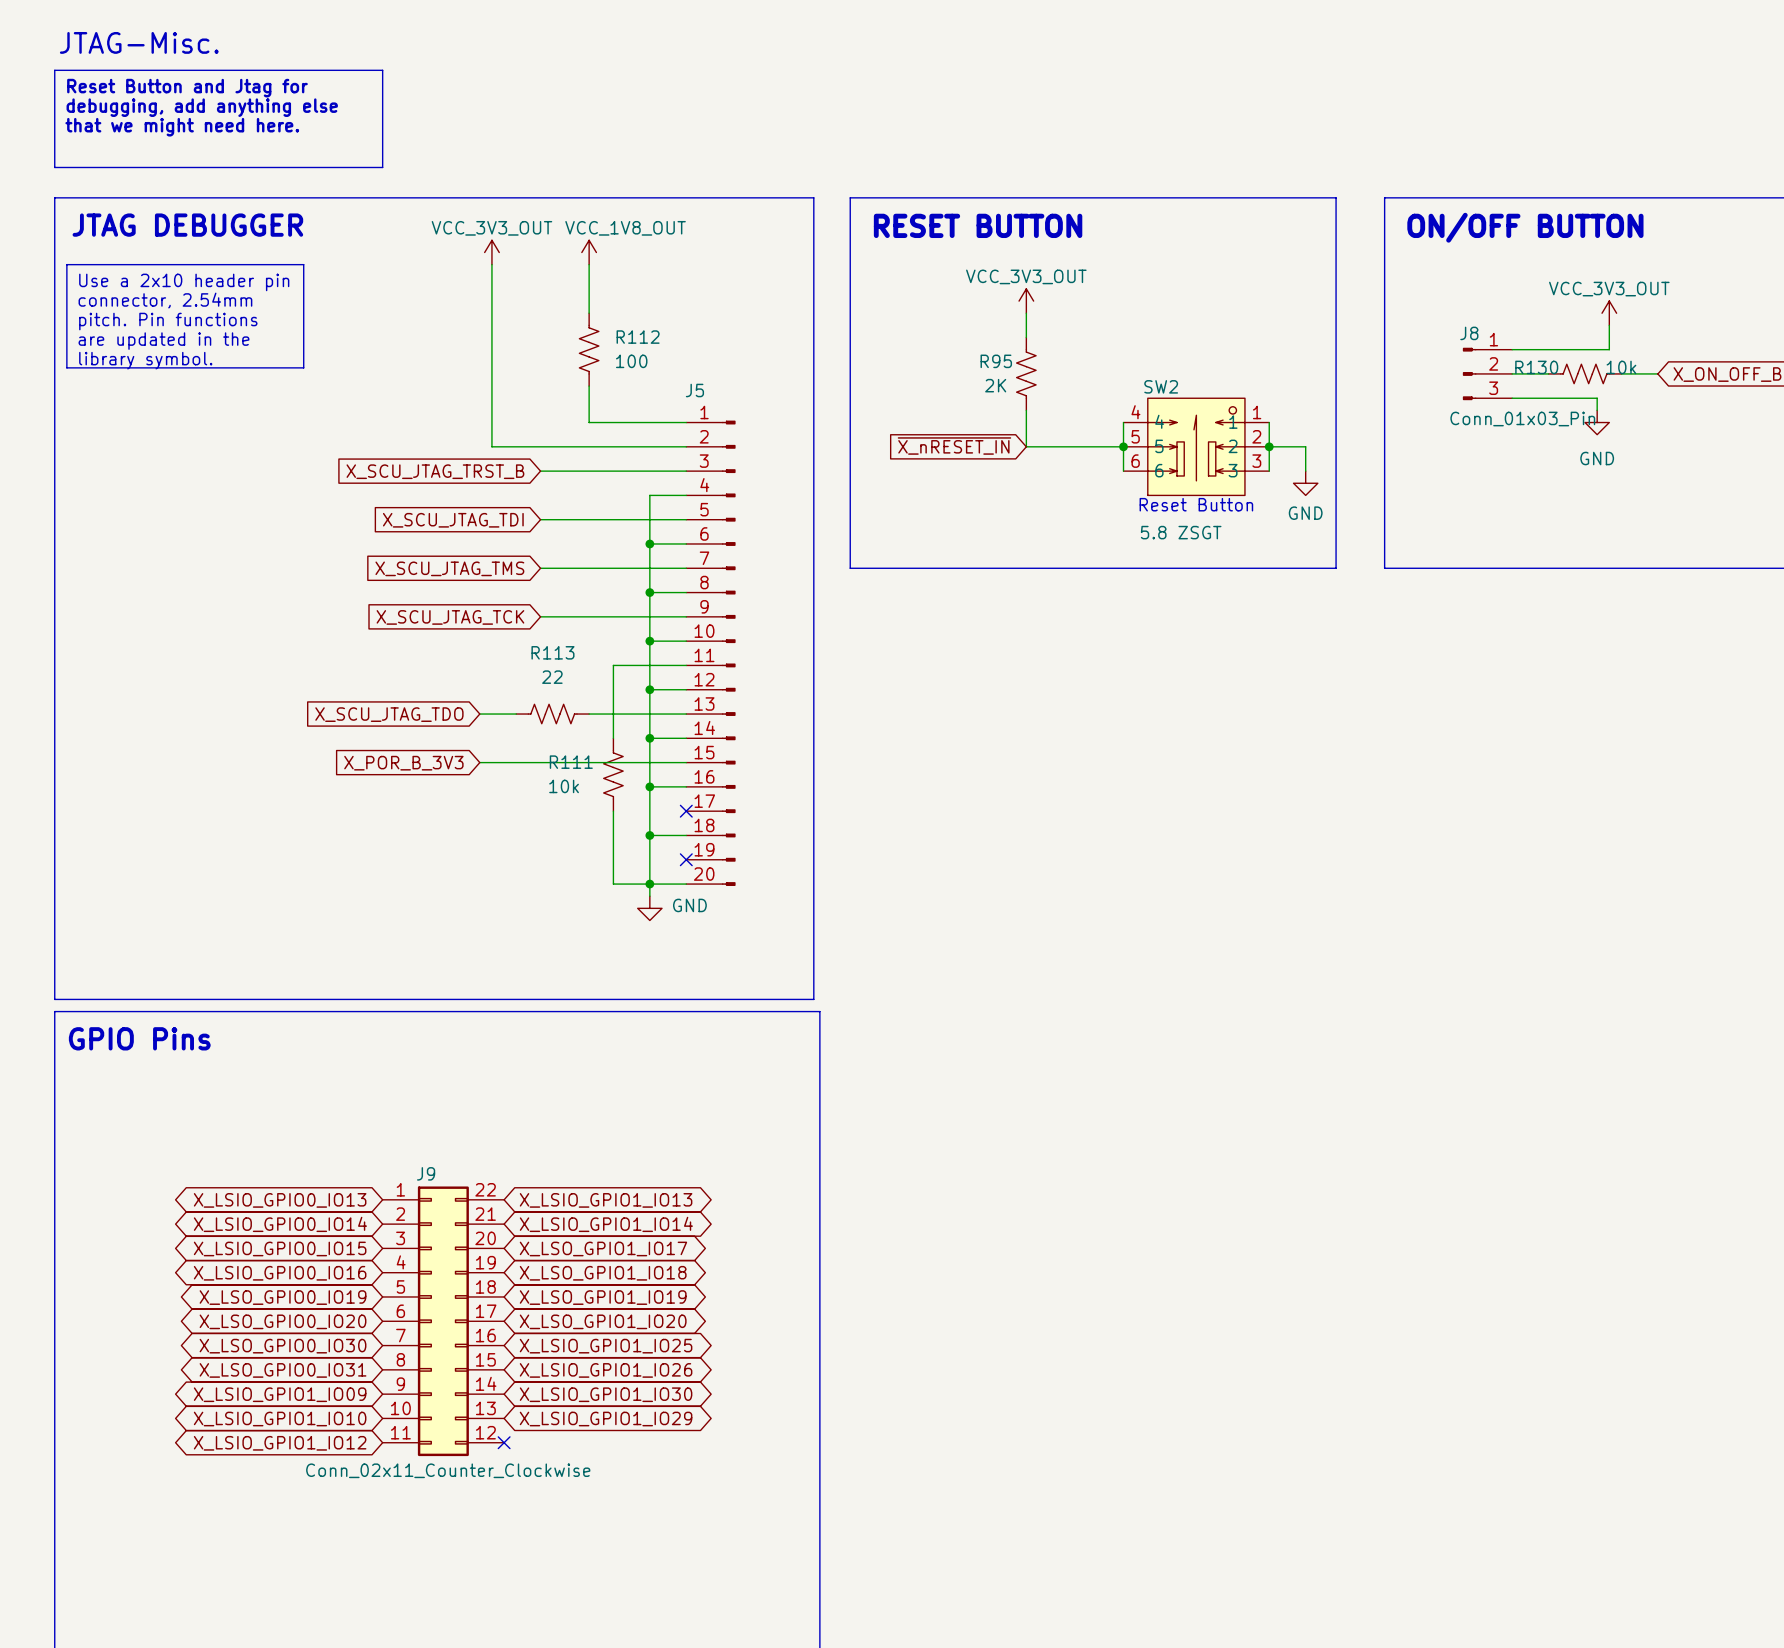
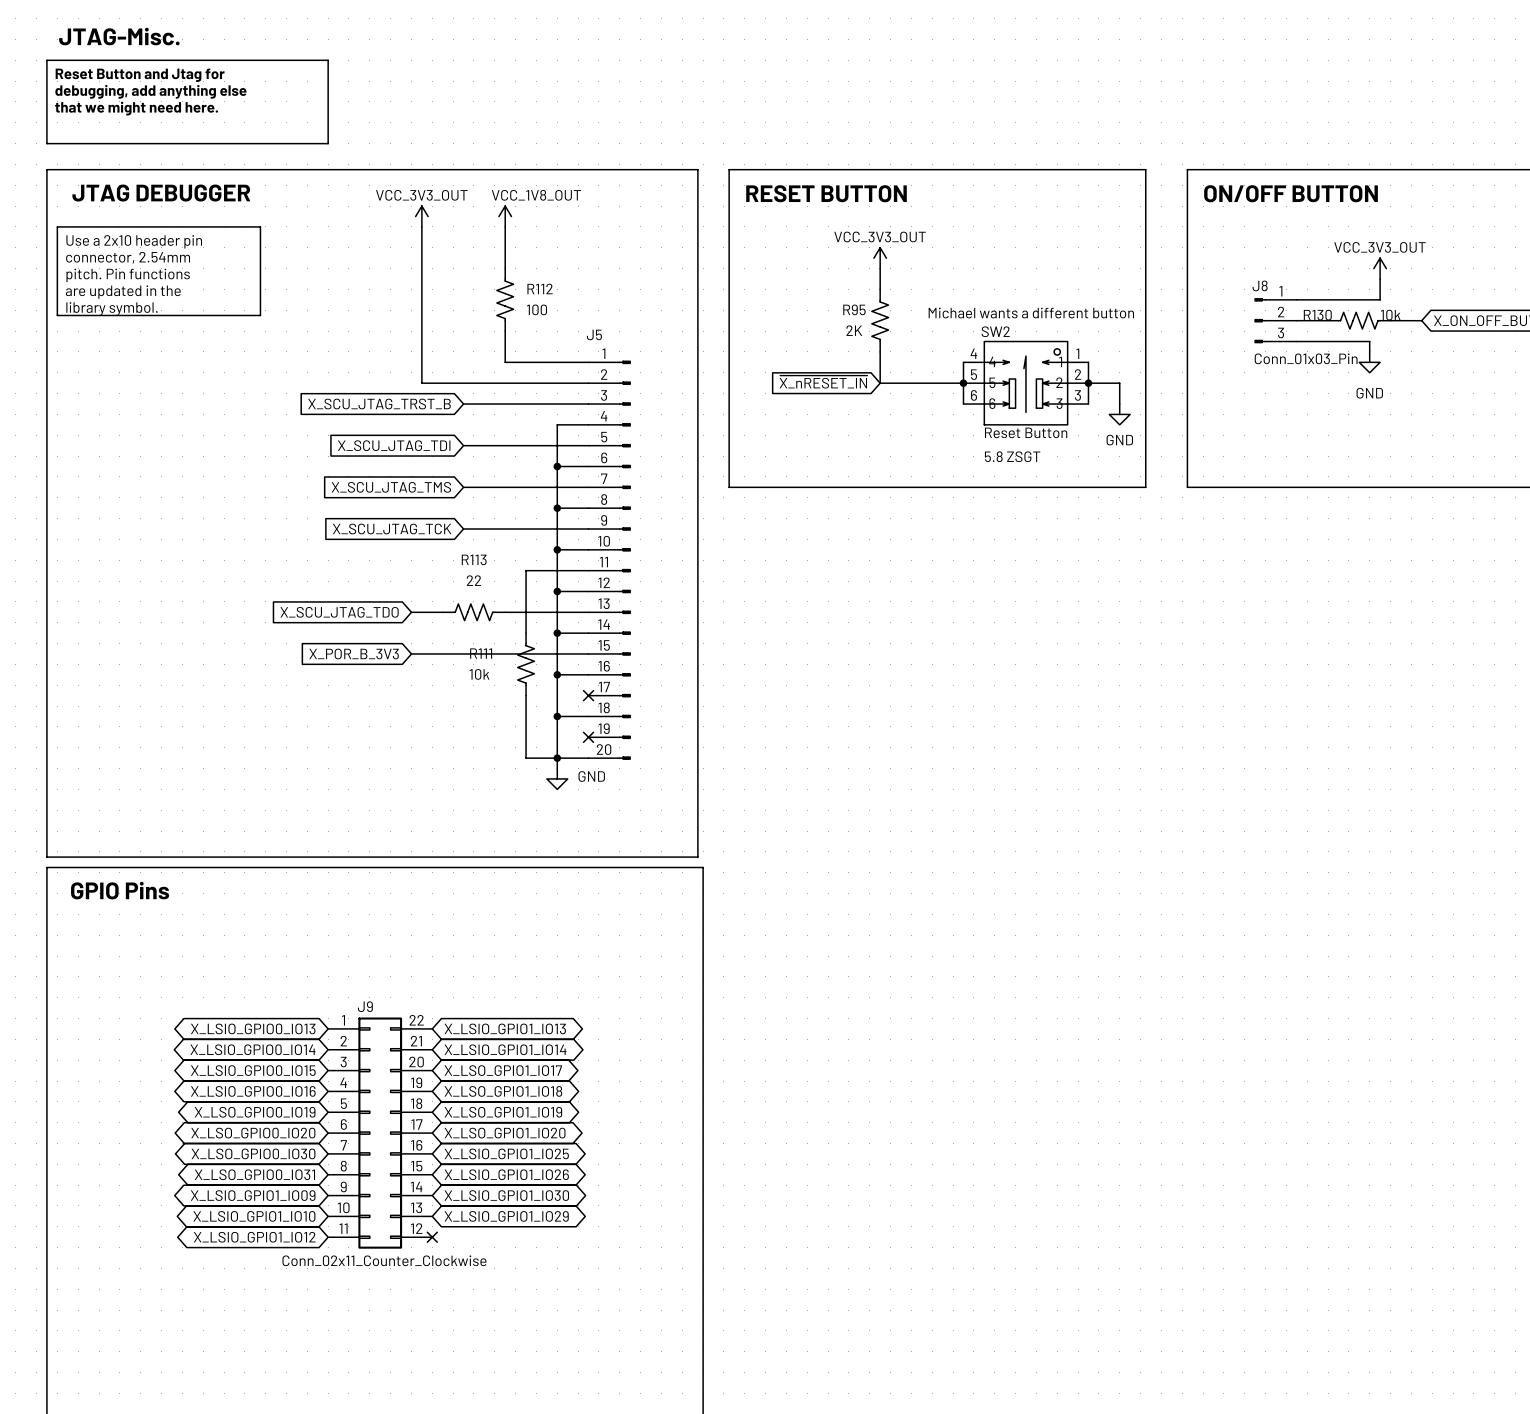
text: none -> Michael wants a different button (1031, 313)

